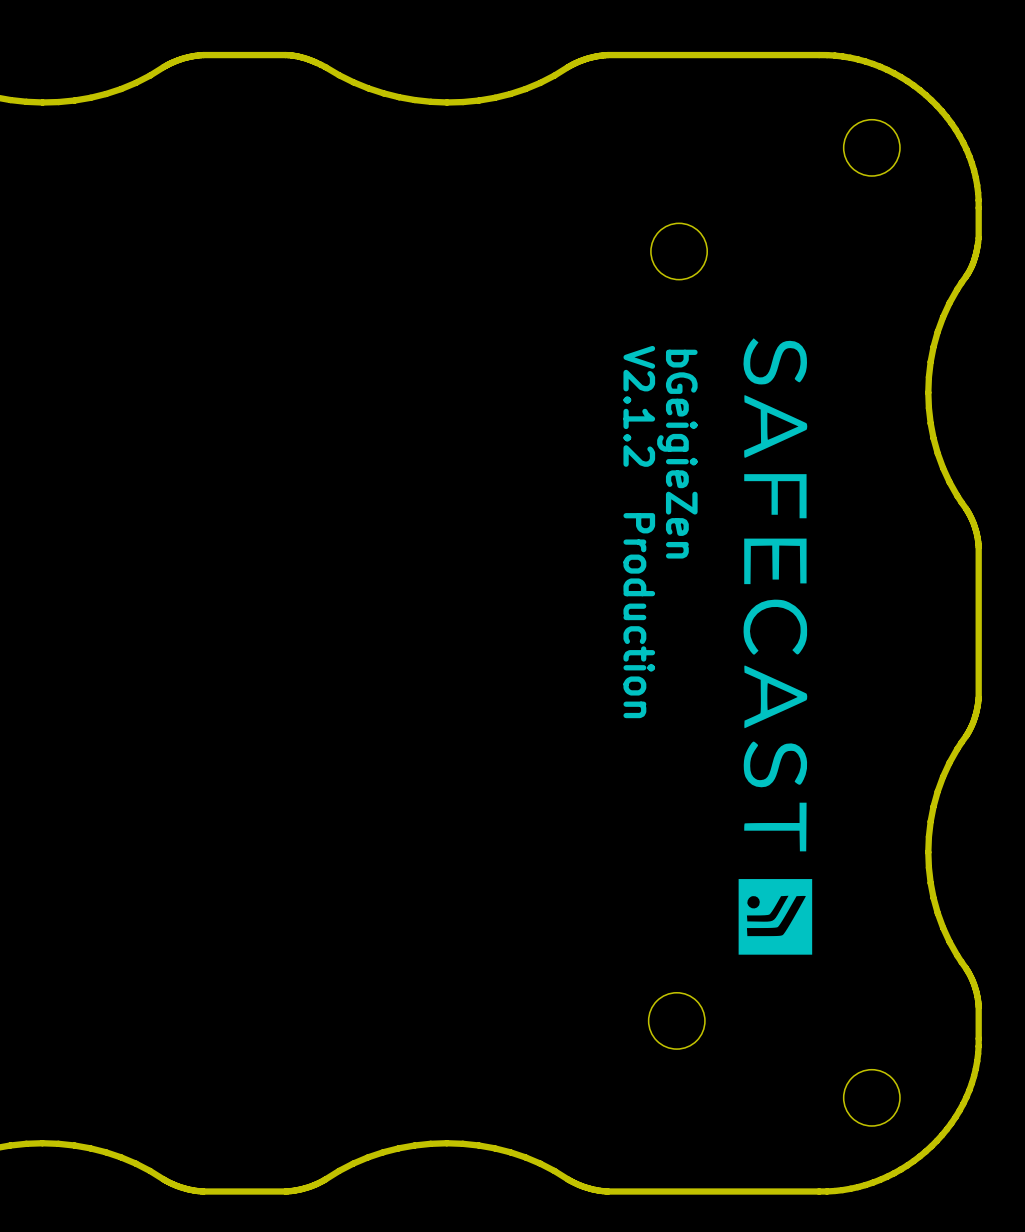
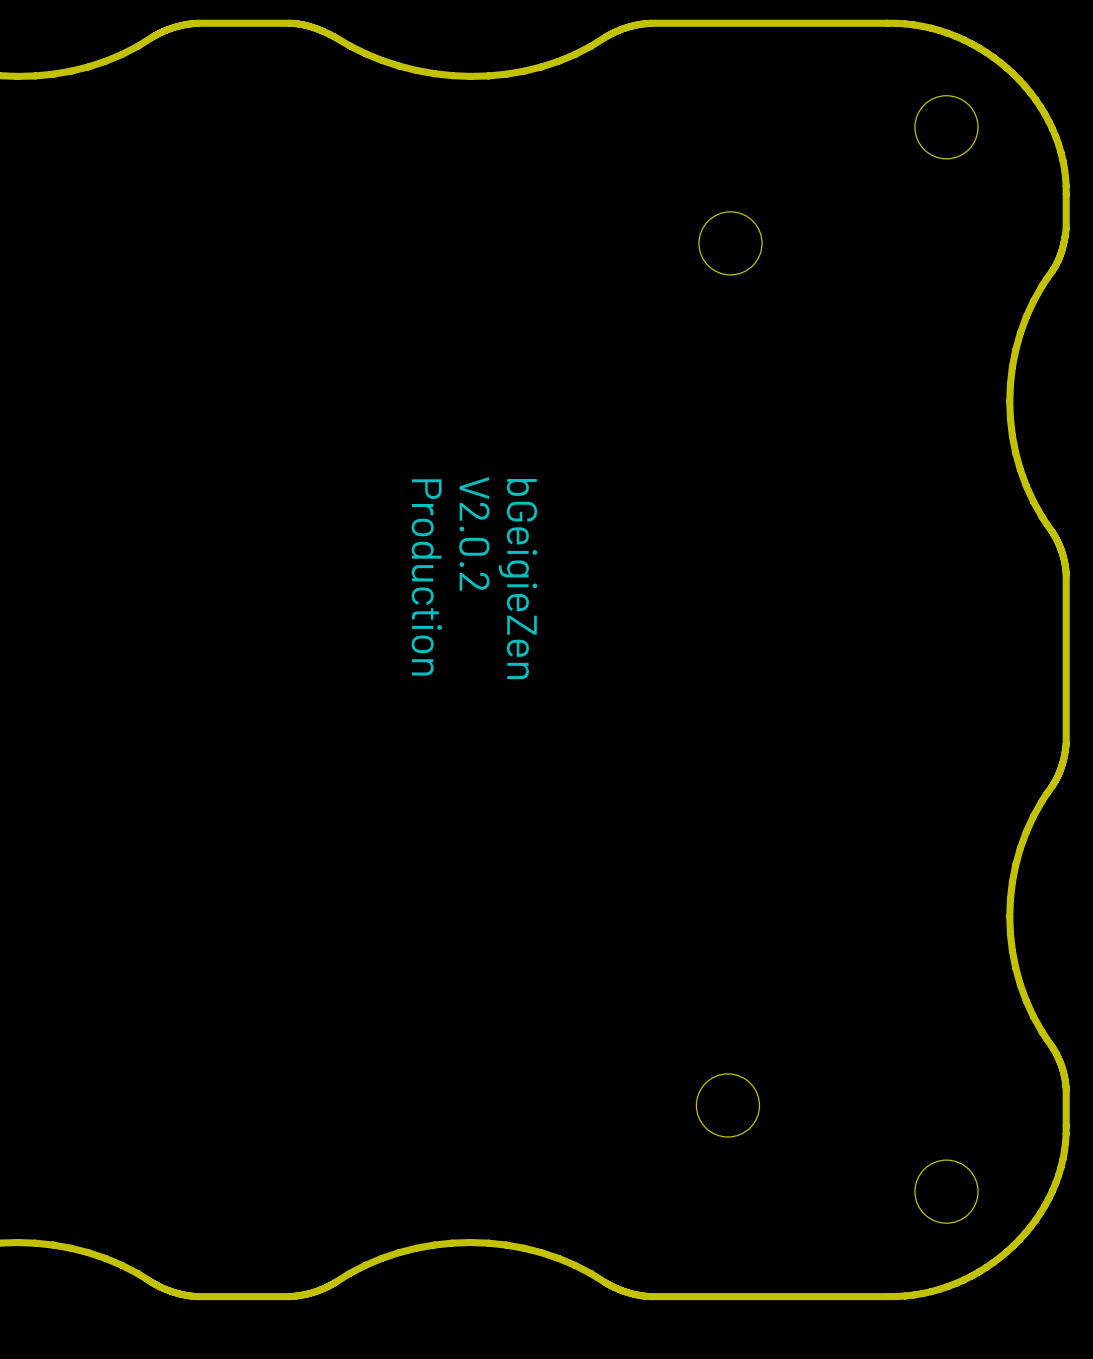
drawing: [738, 338, 813, 955] -> none
text position: bGeigieZen (677, 454) -> bGeigieZen (518, 579)
text: none -> V2.0.2 (474, 533)
text: V2.1.2 Production (639, 532) -> none
text: none -> Production (426, 577)

